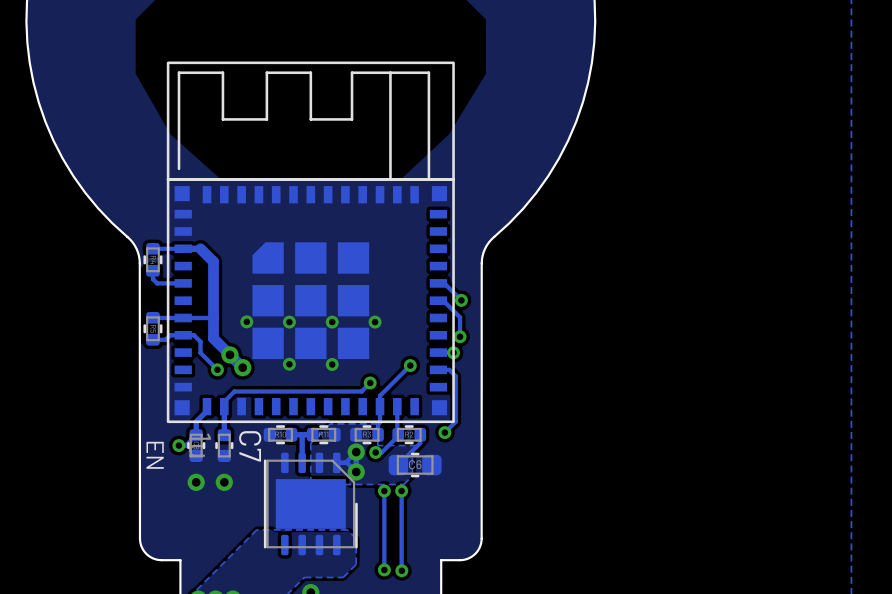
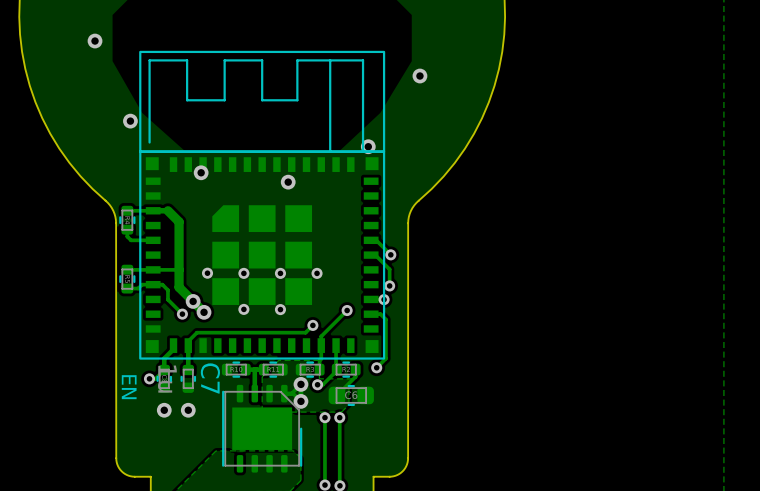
via: none -> (95, 41)
via: none -> (419, 76)
via: none -> (130, 121)
via: none -> (368, 146)
via: none -> (201, 172)
via: none -> (288, 182)

